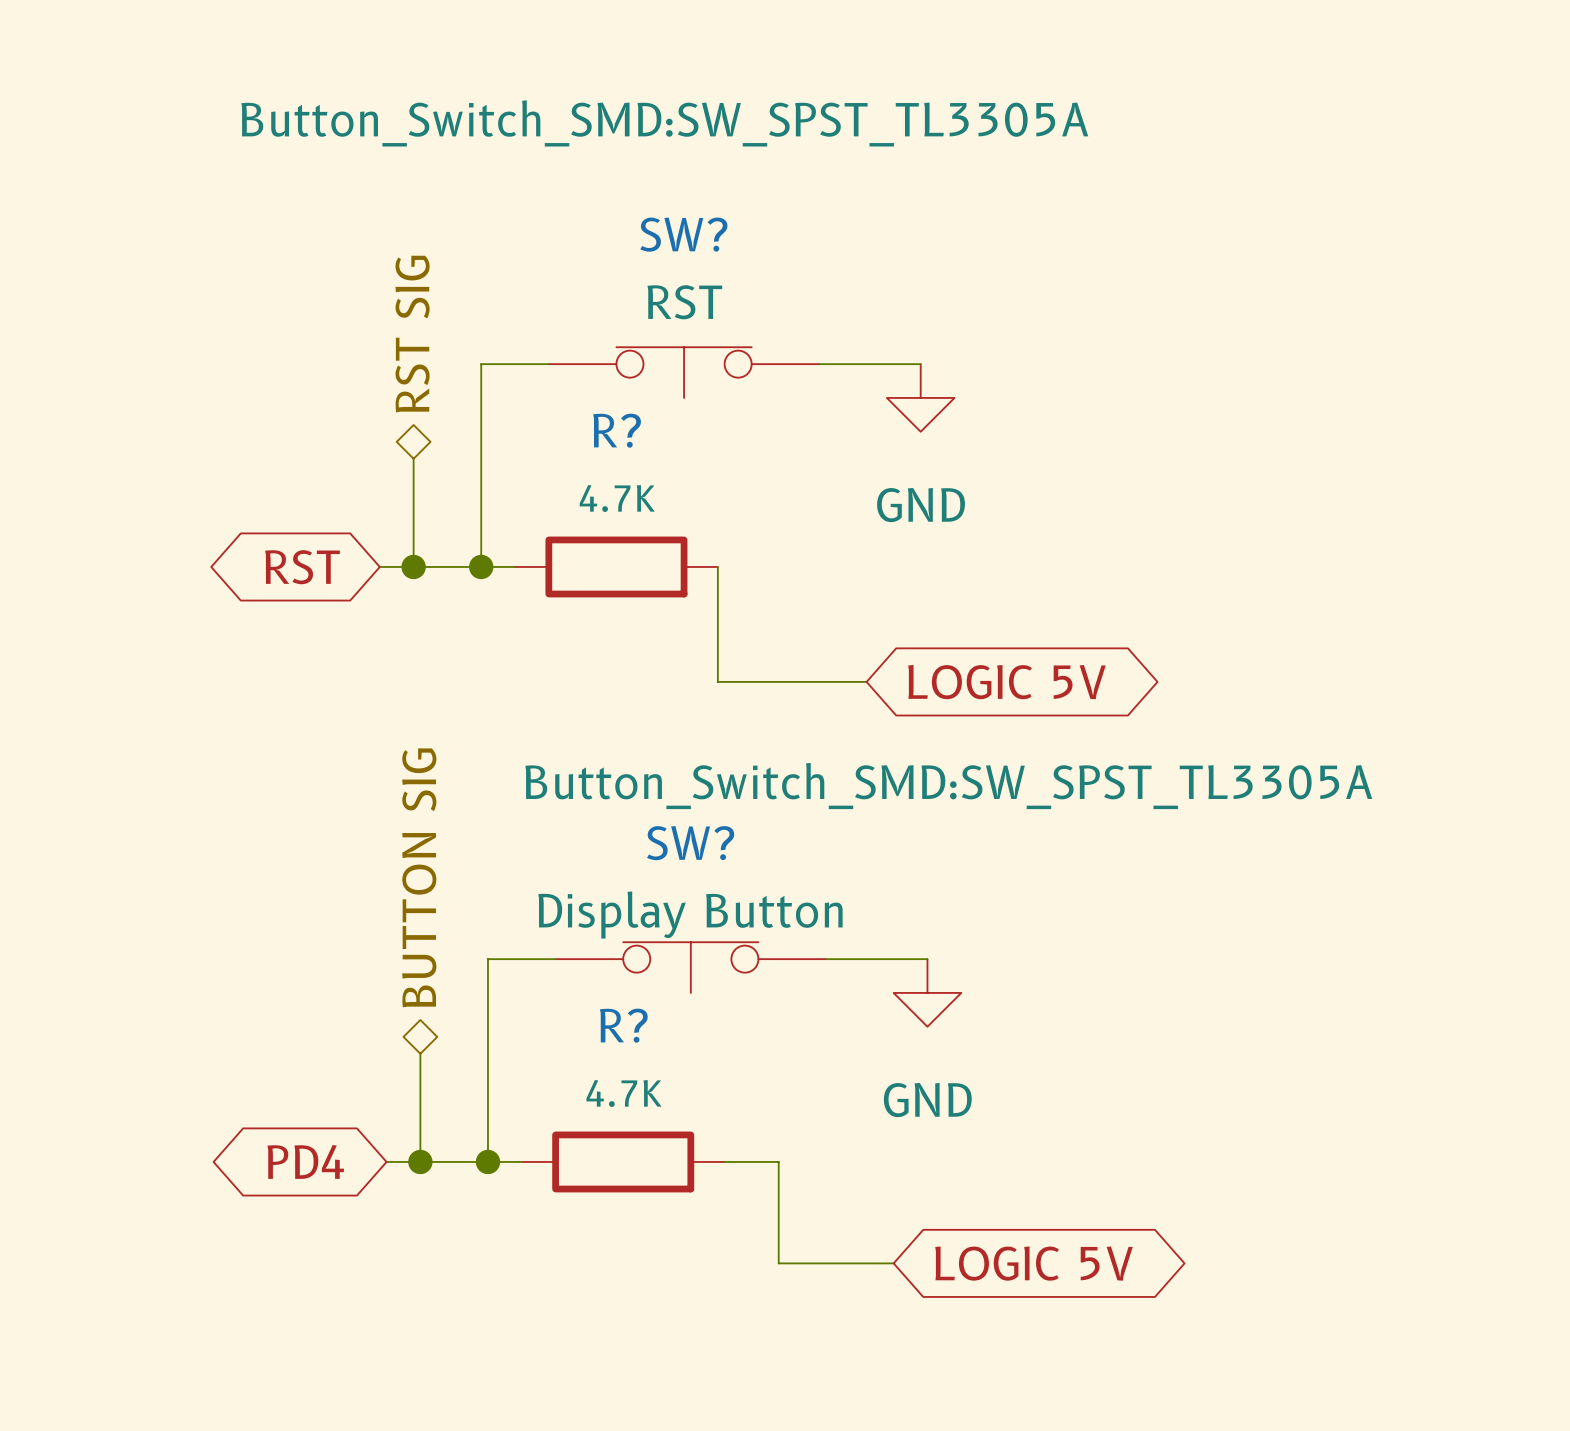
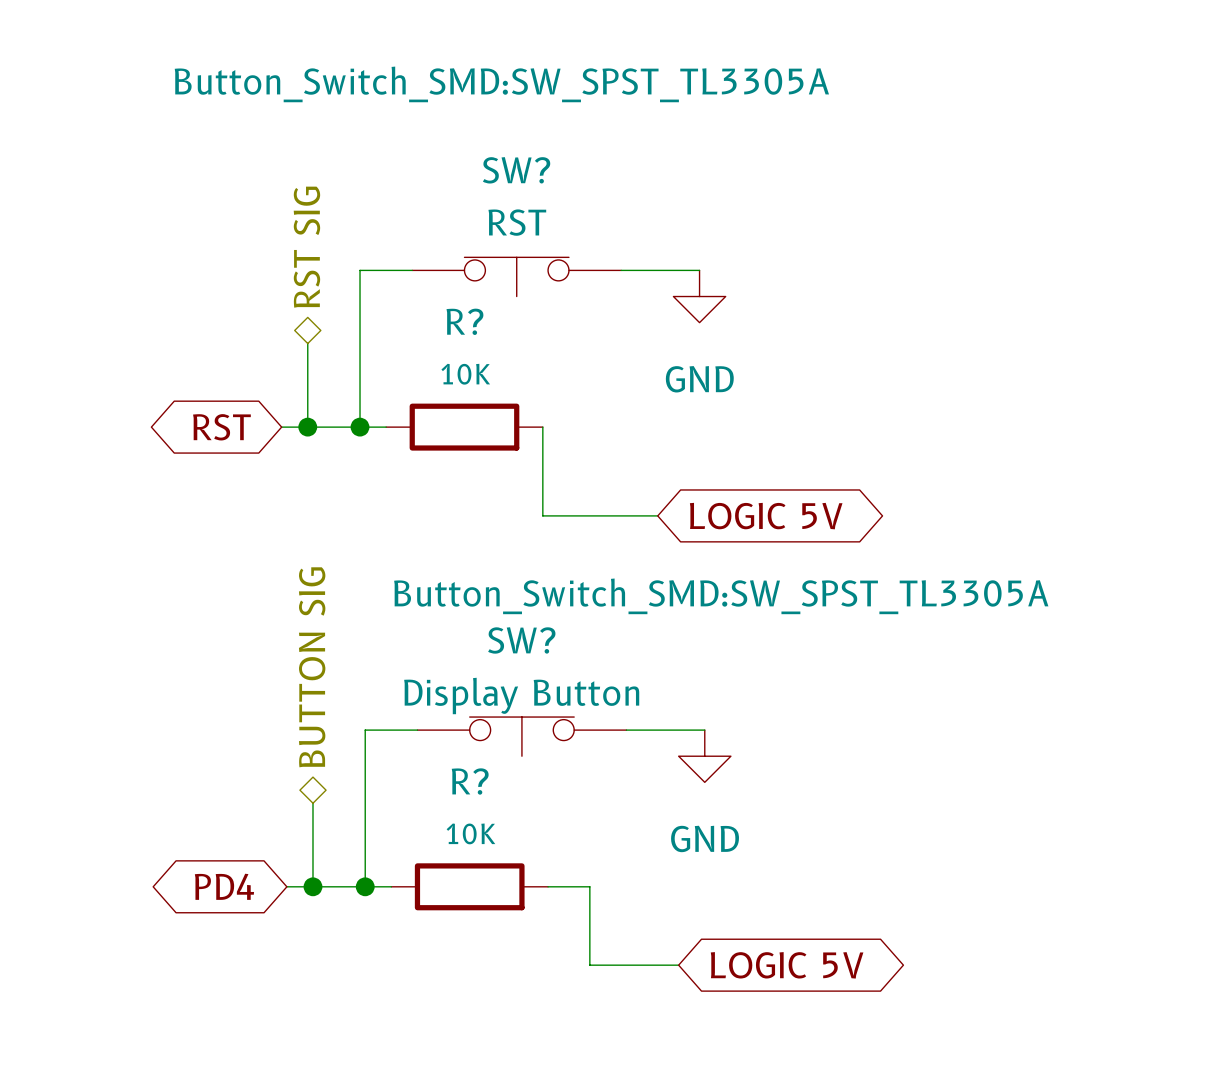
R? value: 4.7K (617, 498) -> 10K (465, 374)
R? value: 4.7K (624, 1093) -> 10K (470, 833)

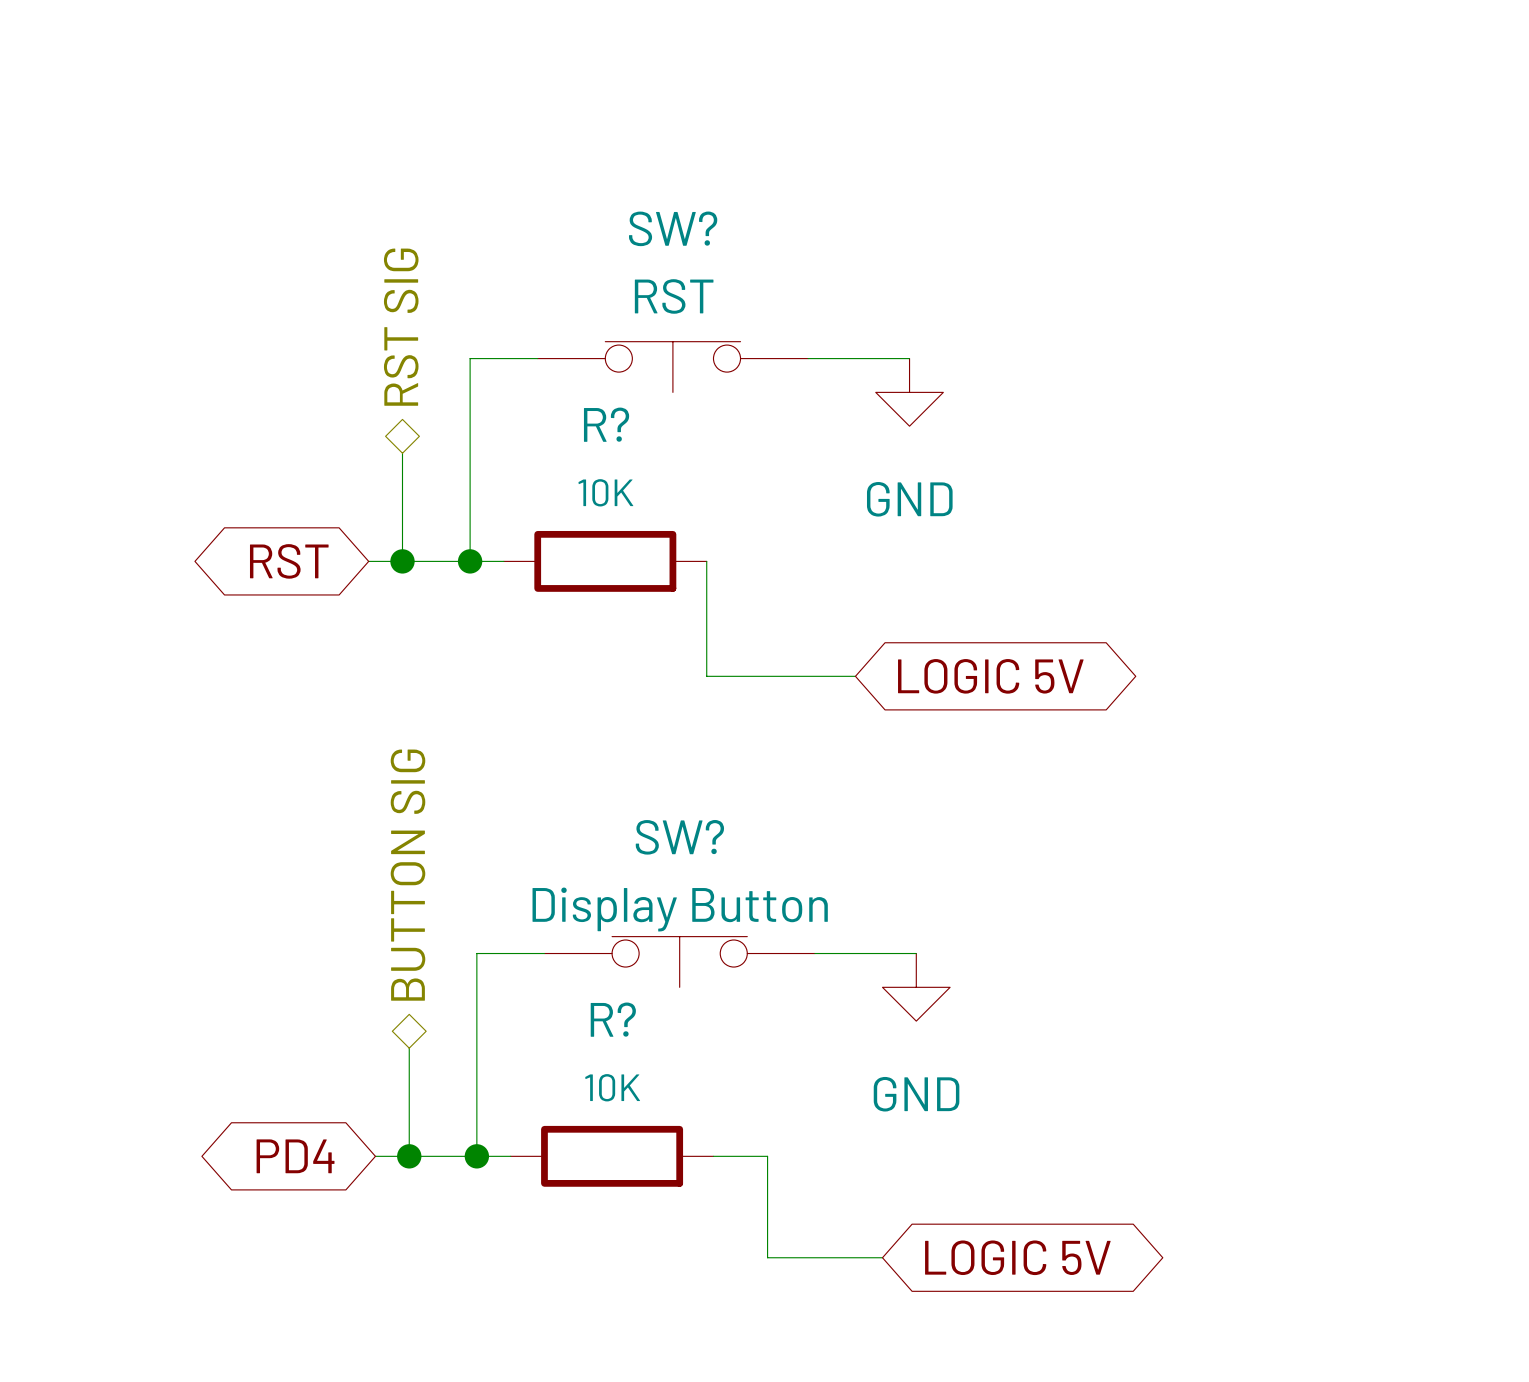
SW? text: Button_Switch_SMD:SW_SPST_TL3305A (501, 84) -> none
SW? text: Button_Switch_SMD:SW_SPST_TL3305A (721, 596) -> none

